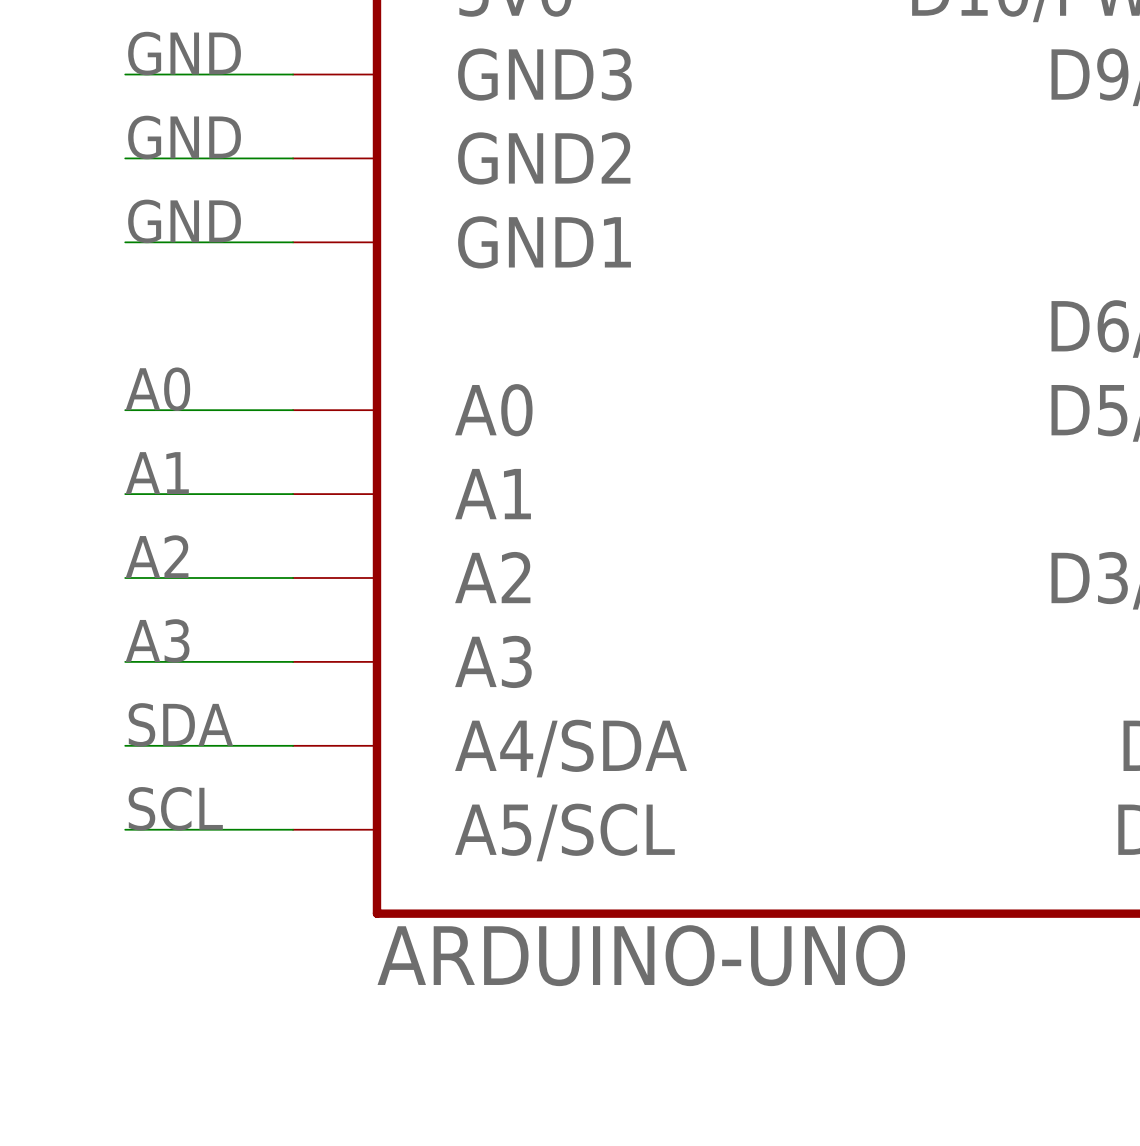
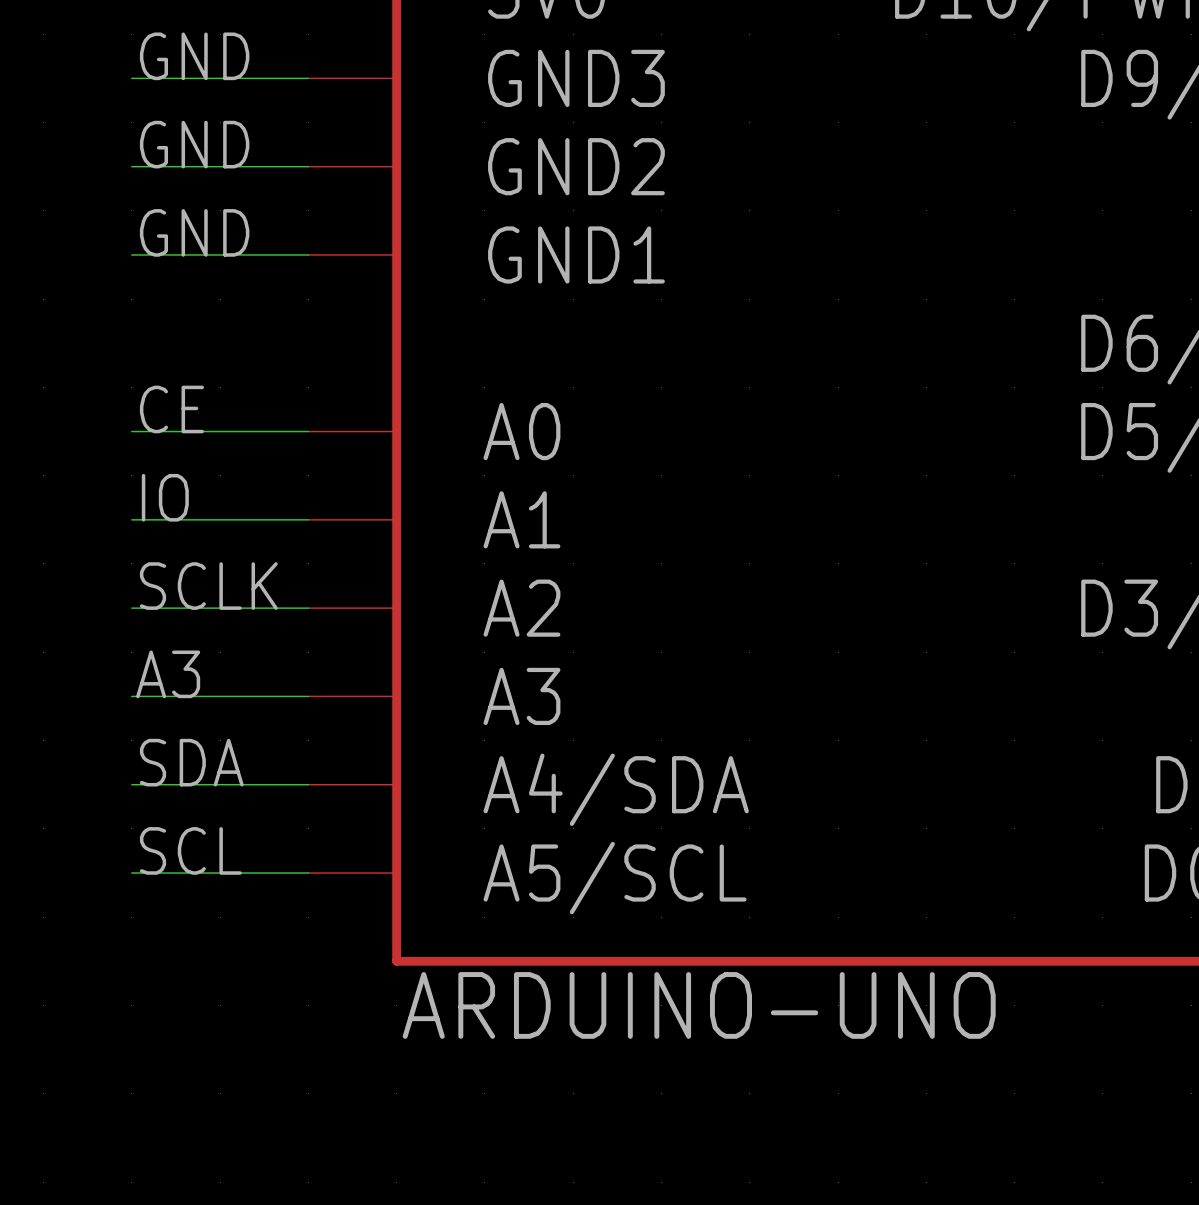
label: A0 (157, 389) -> CE (171, 409)
label: A1 (157, 473) -> IO (165, 497)
label: A2 (157, 556) -> SCLK (208, 586)

